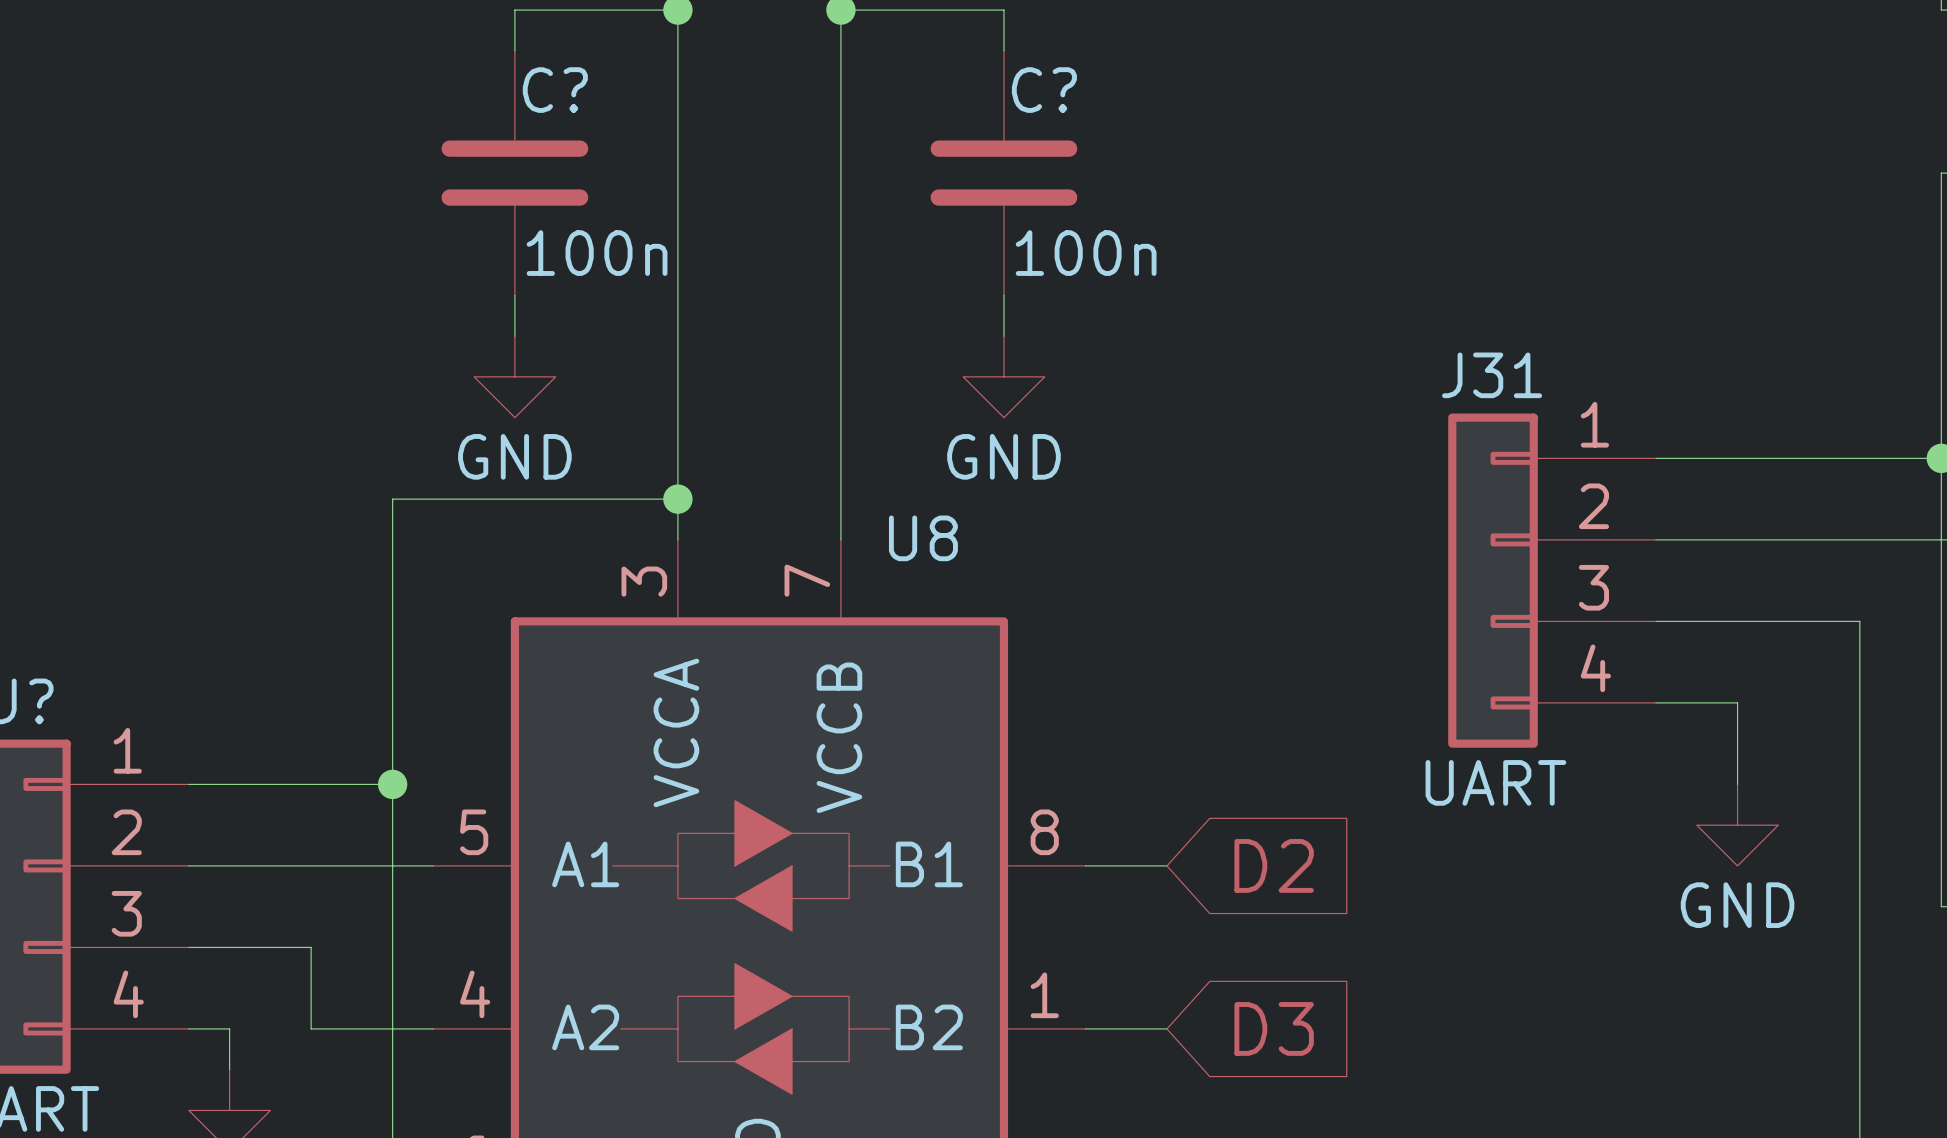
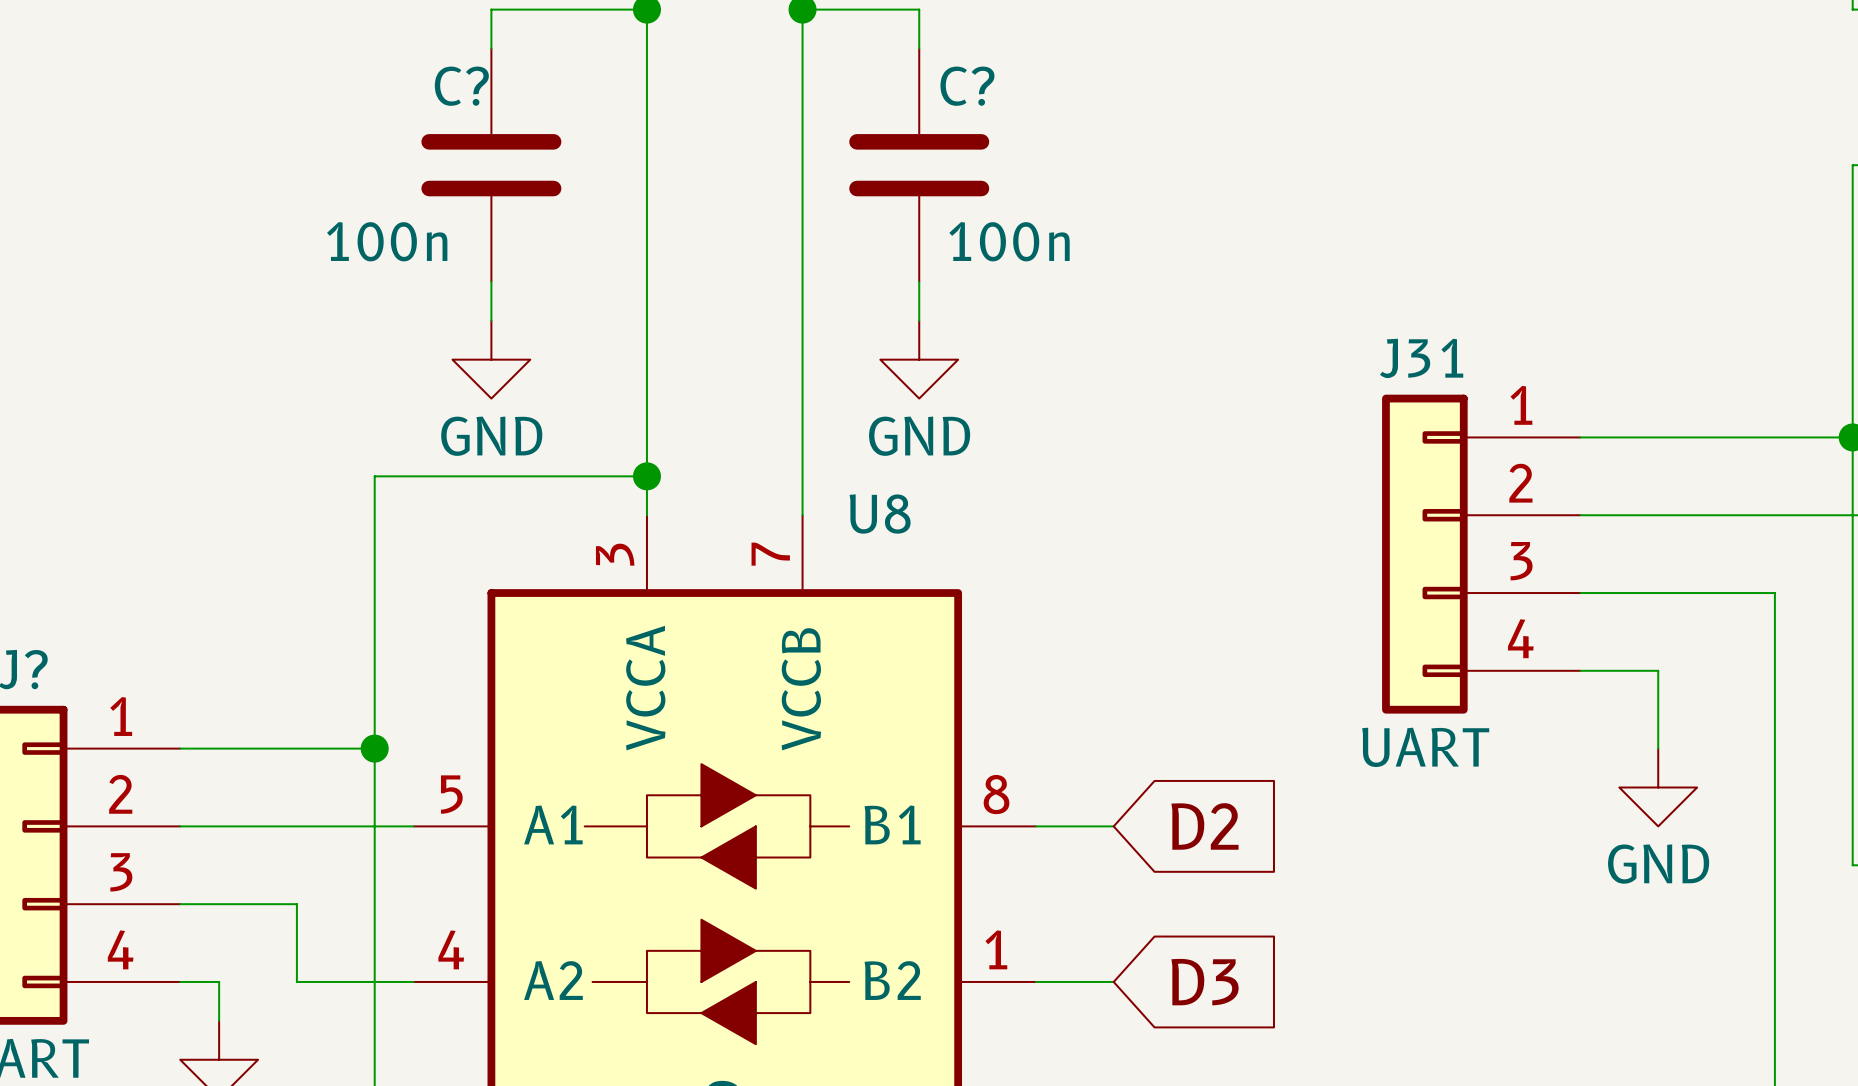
wire: (963, 10) (1003, 10) (1003, 50) -> (919, 9) (919, 48)
C? name position: C? (555, 90) -> C? (461, 86)
C? position: (1003, 173) -> (919, 165)
C? value position: 100n (597, 253) -> 100n (387, 241)
wire: (1003, 295) (1003, 336) -> (919, 281) (919, 320)
power symbol position: GND (1003, 376) -> GND (919, 359)

